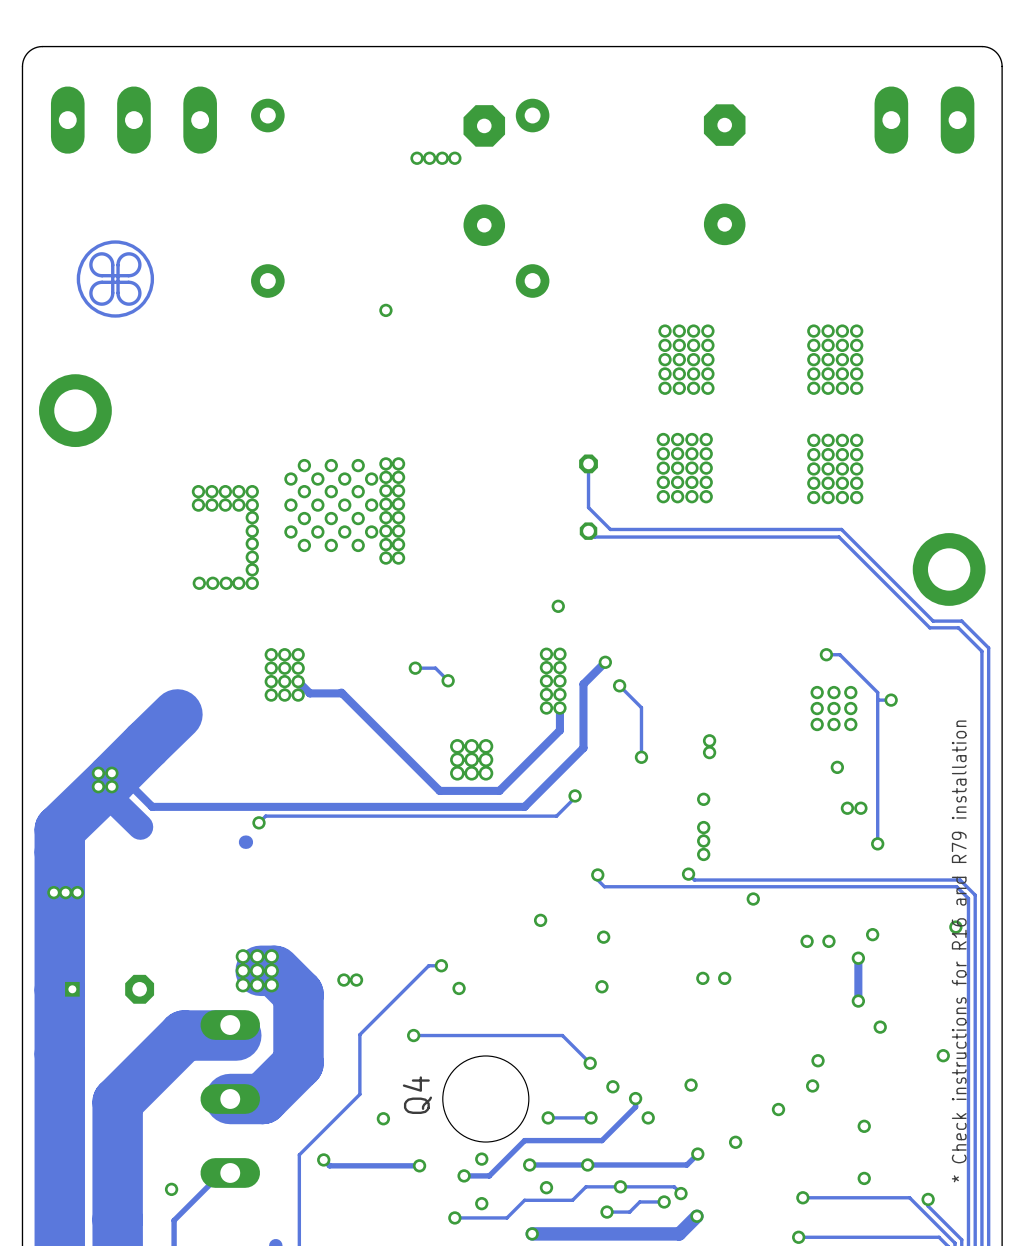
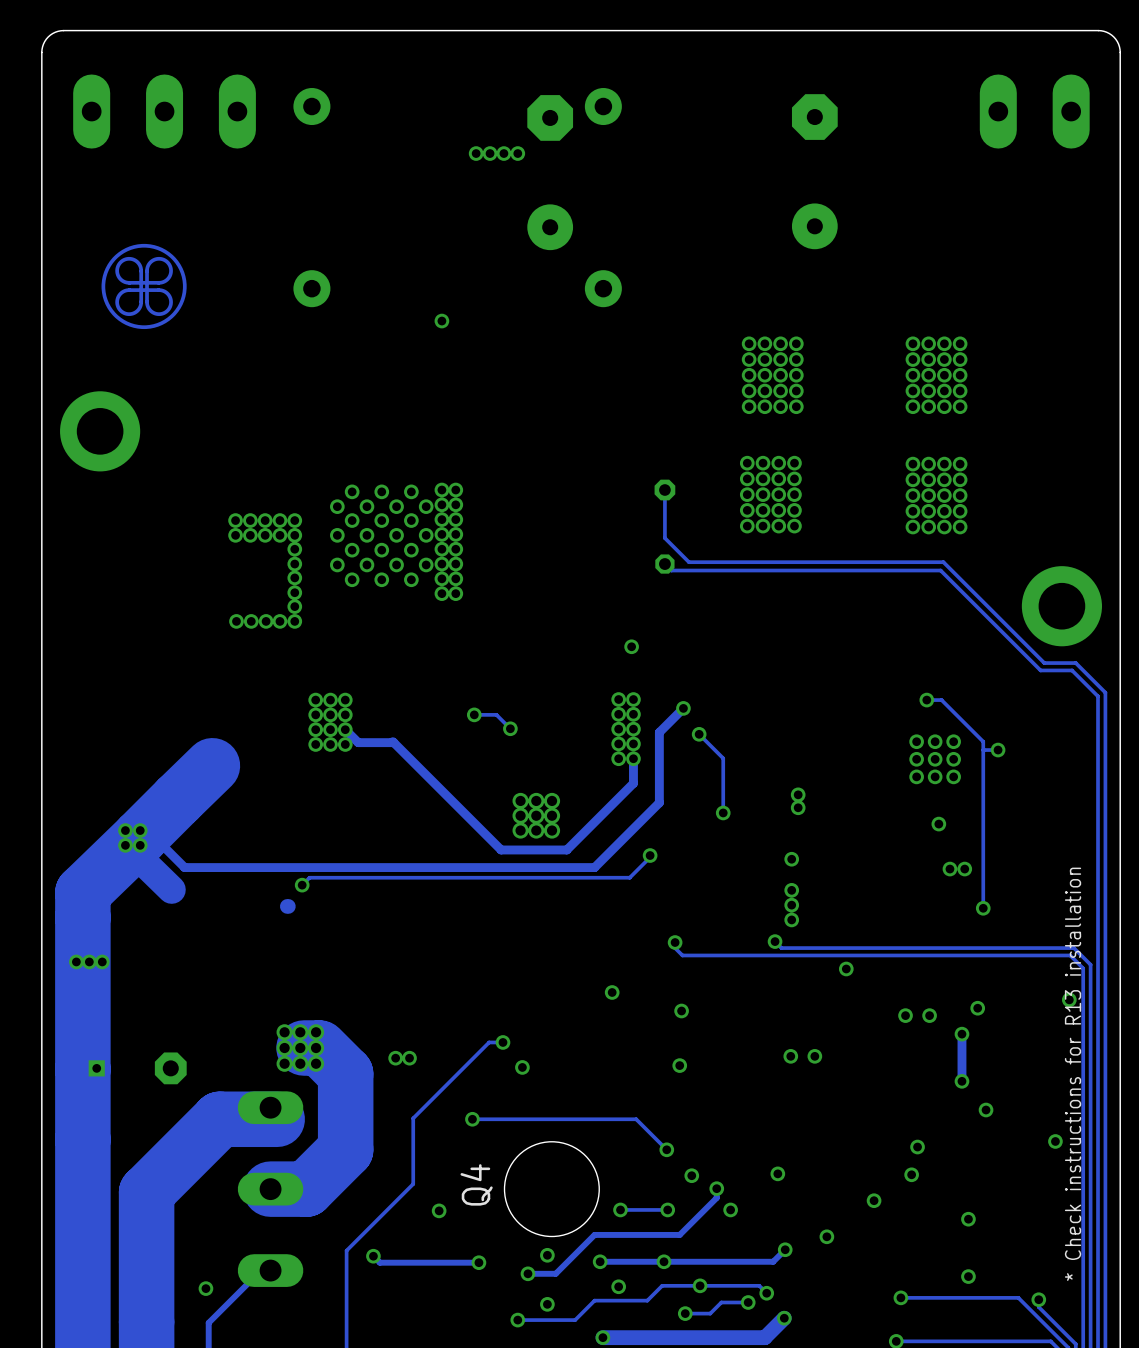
text: * Check instructions for R16 and R79 installation (959, 951) -> * Check instructions for R13 installation (1073, 1074)

